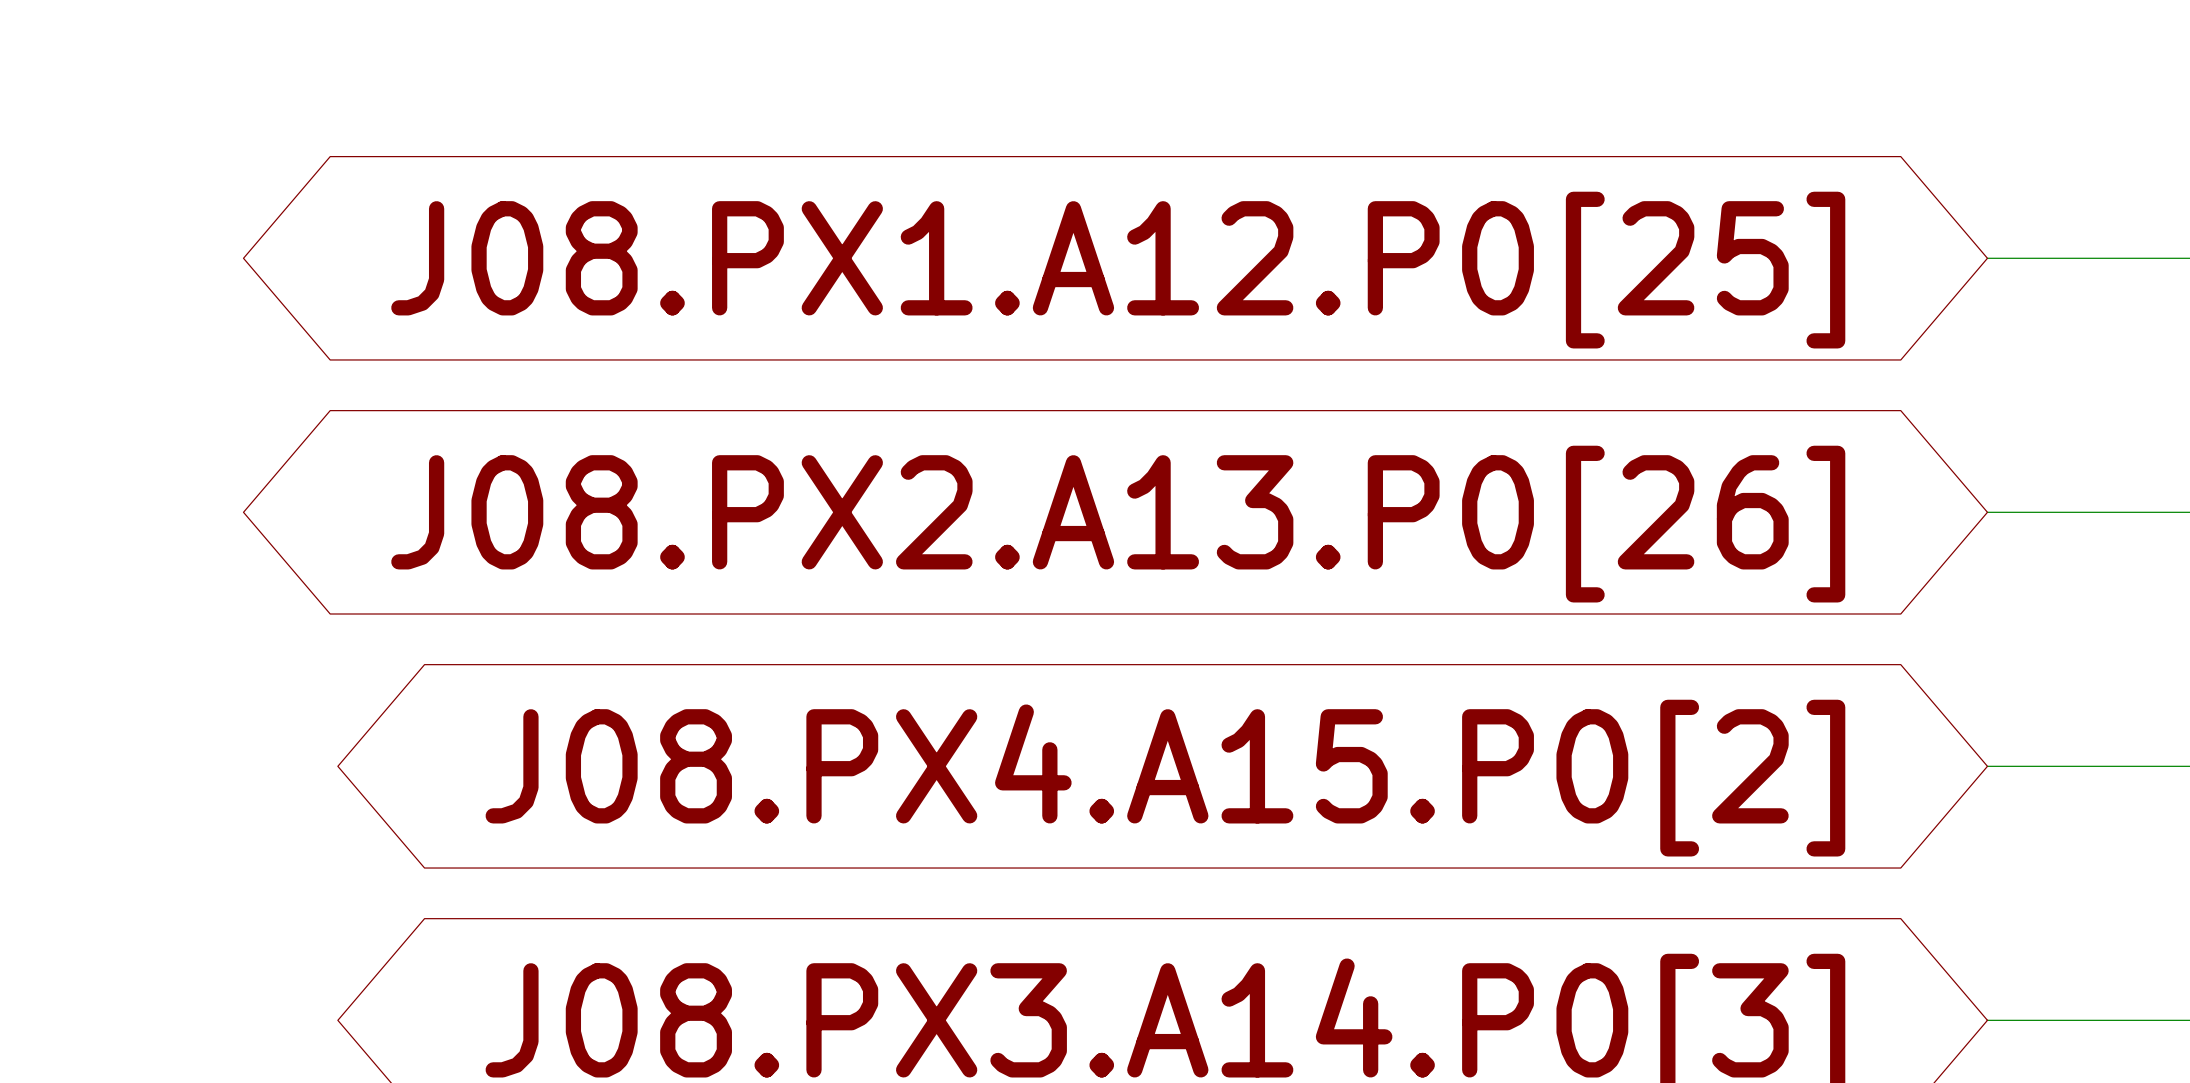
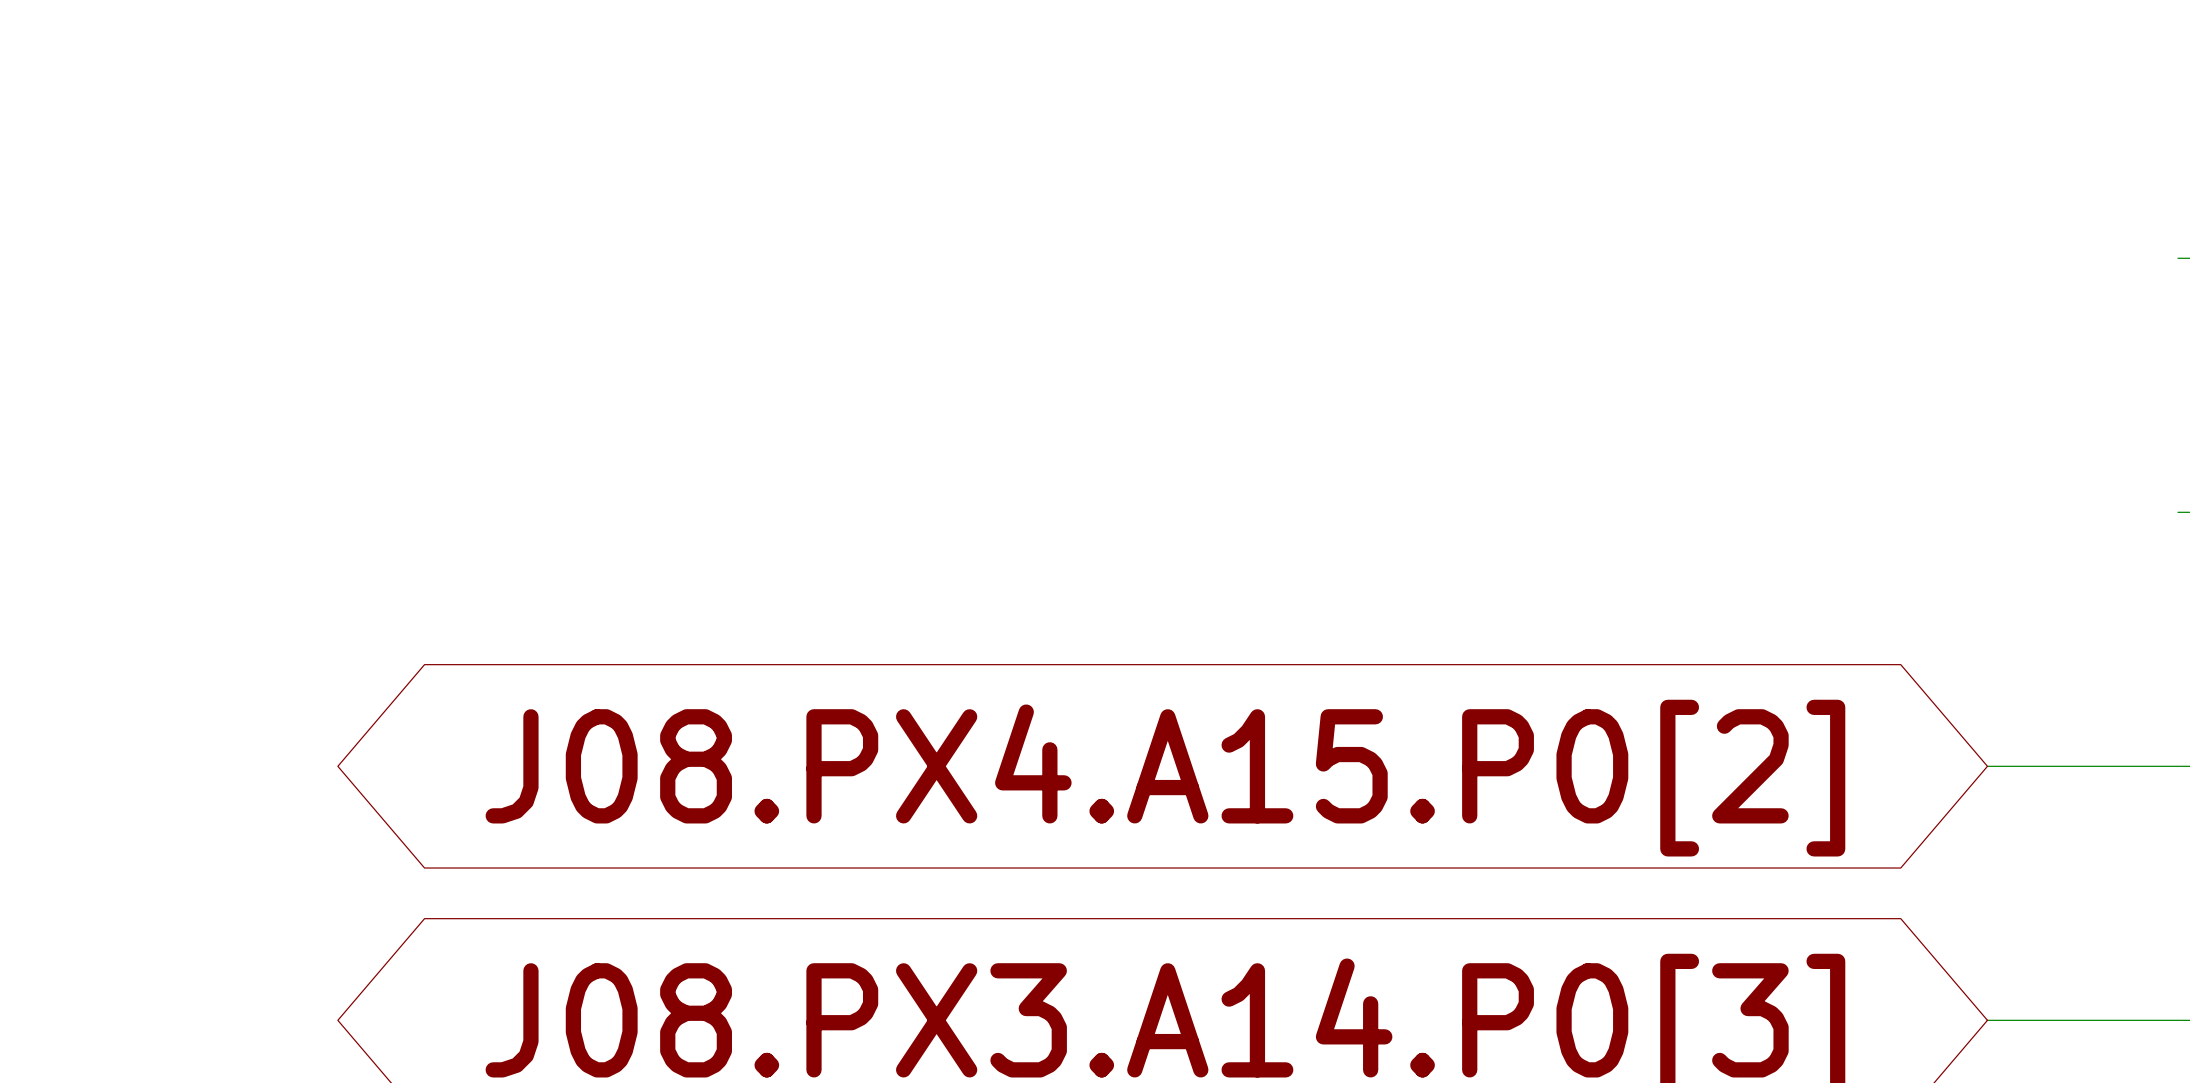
wire: (1987, 258) (2177, 258) -> none
global label: J08.PX1.A12.P0[25] (1118, 270) -> none
wire: (1987, 512) (2177, 512) -> none
global label: J08.PX2.A13.P0[26] (1118, 524) -> none

